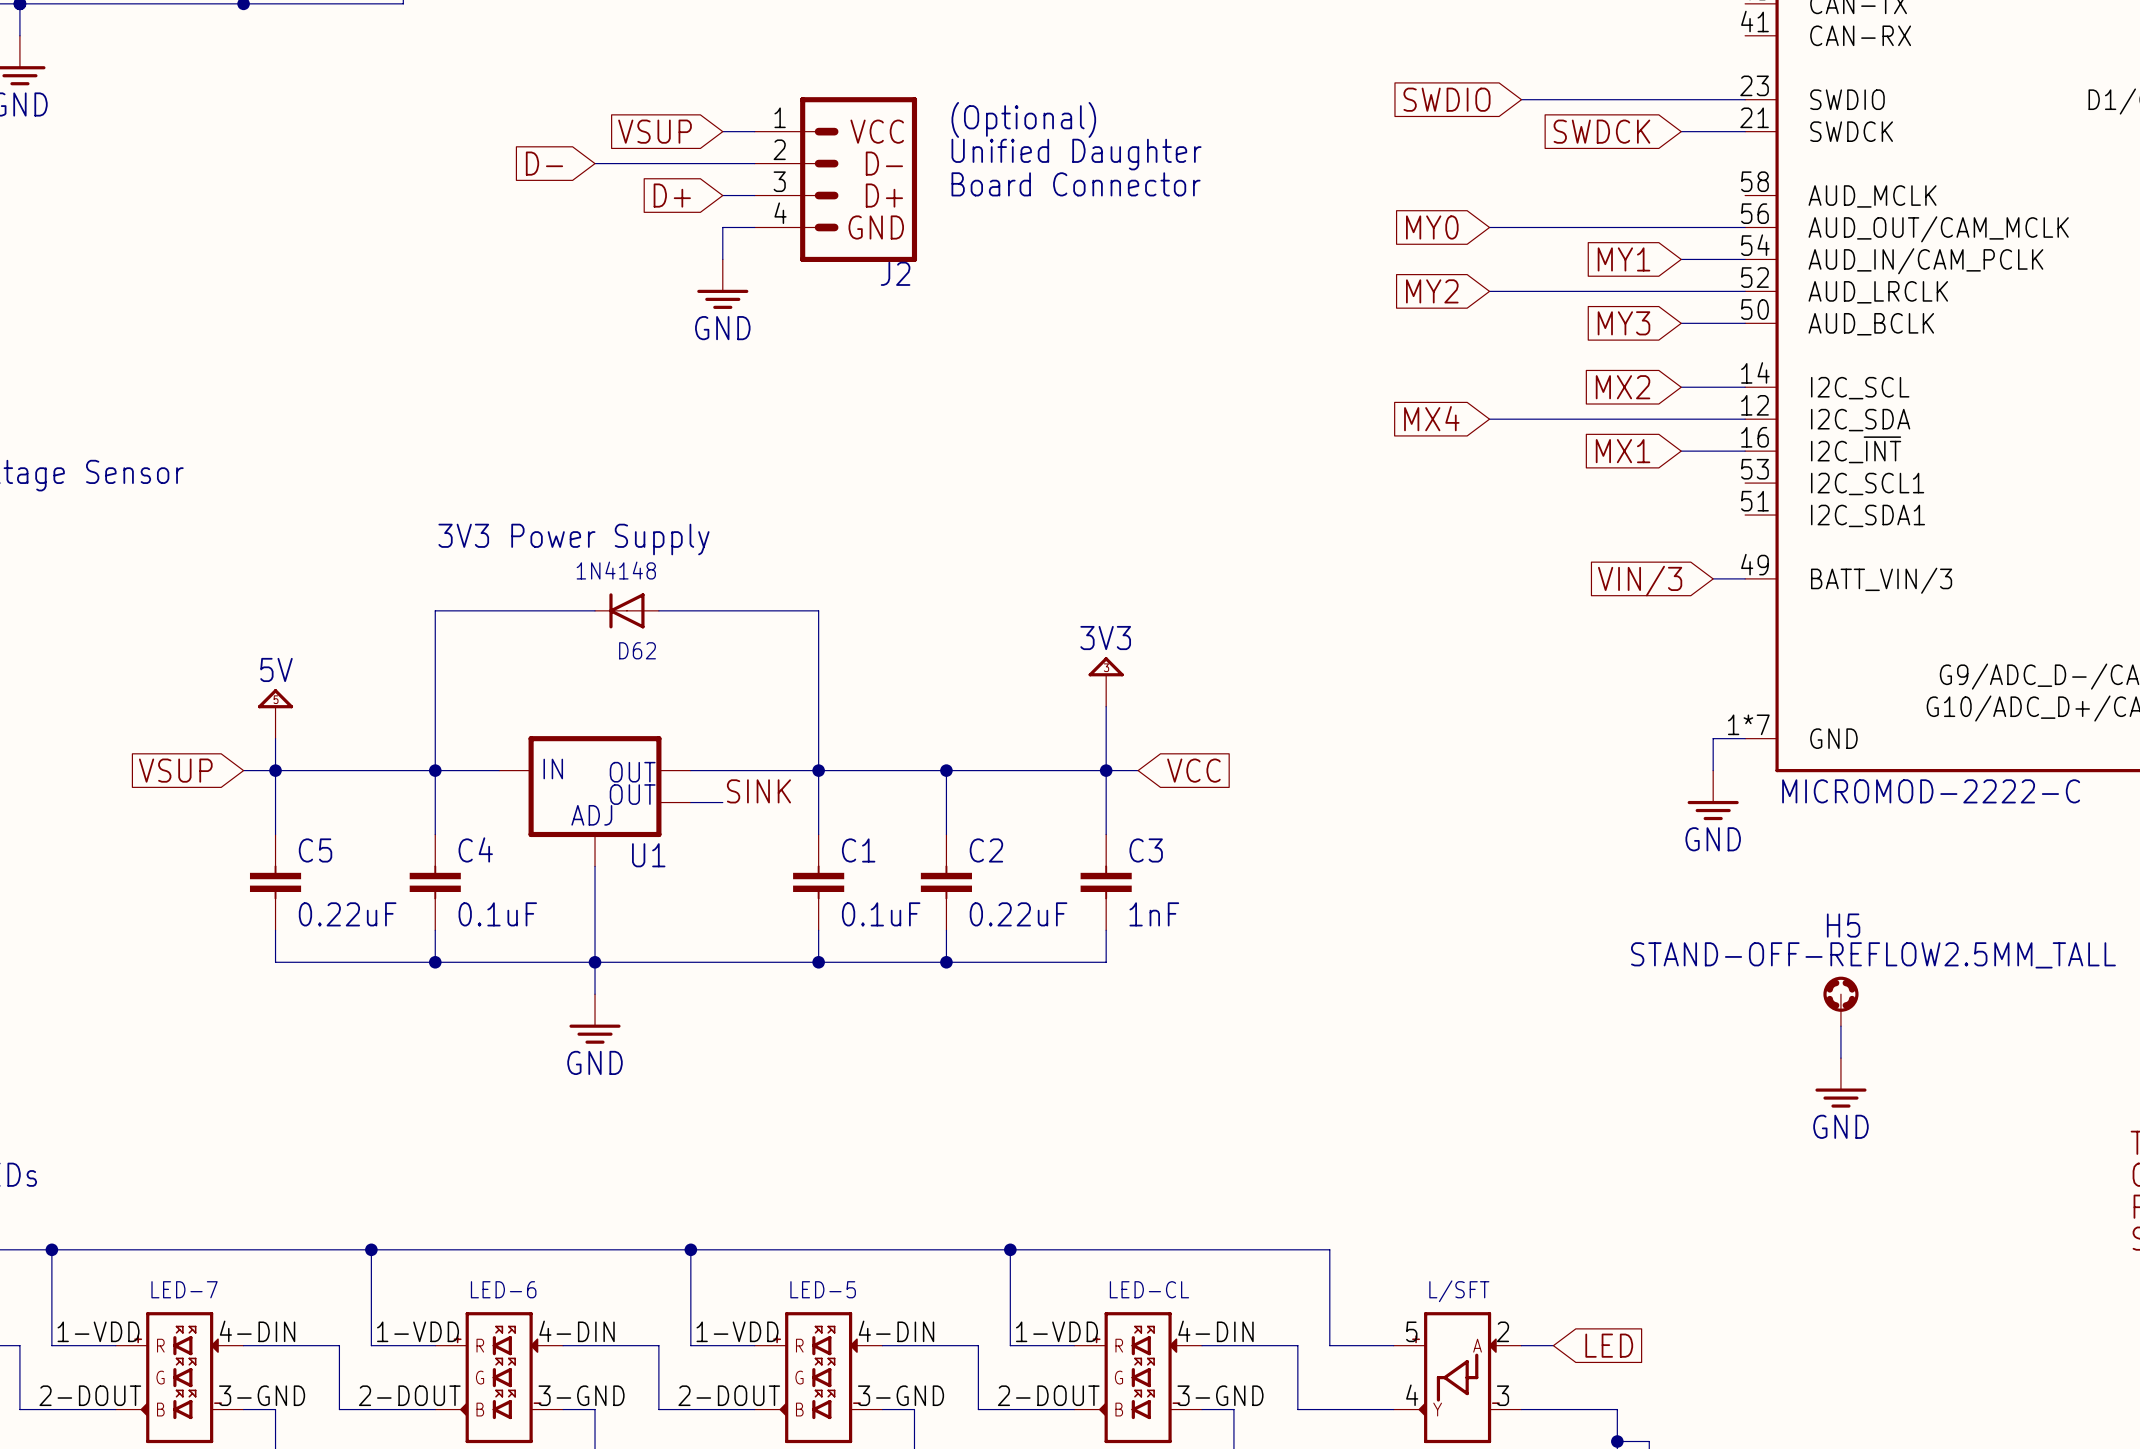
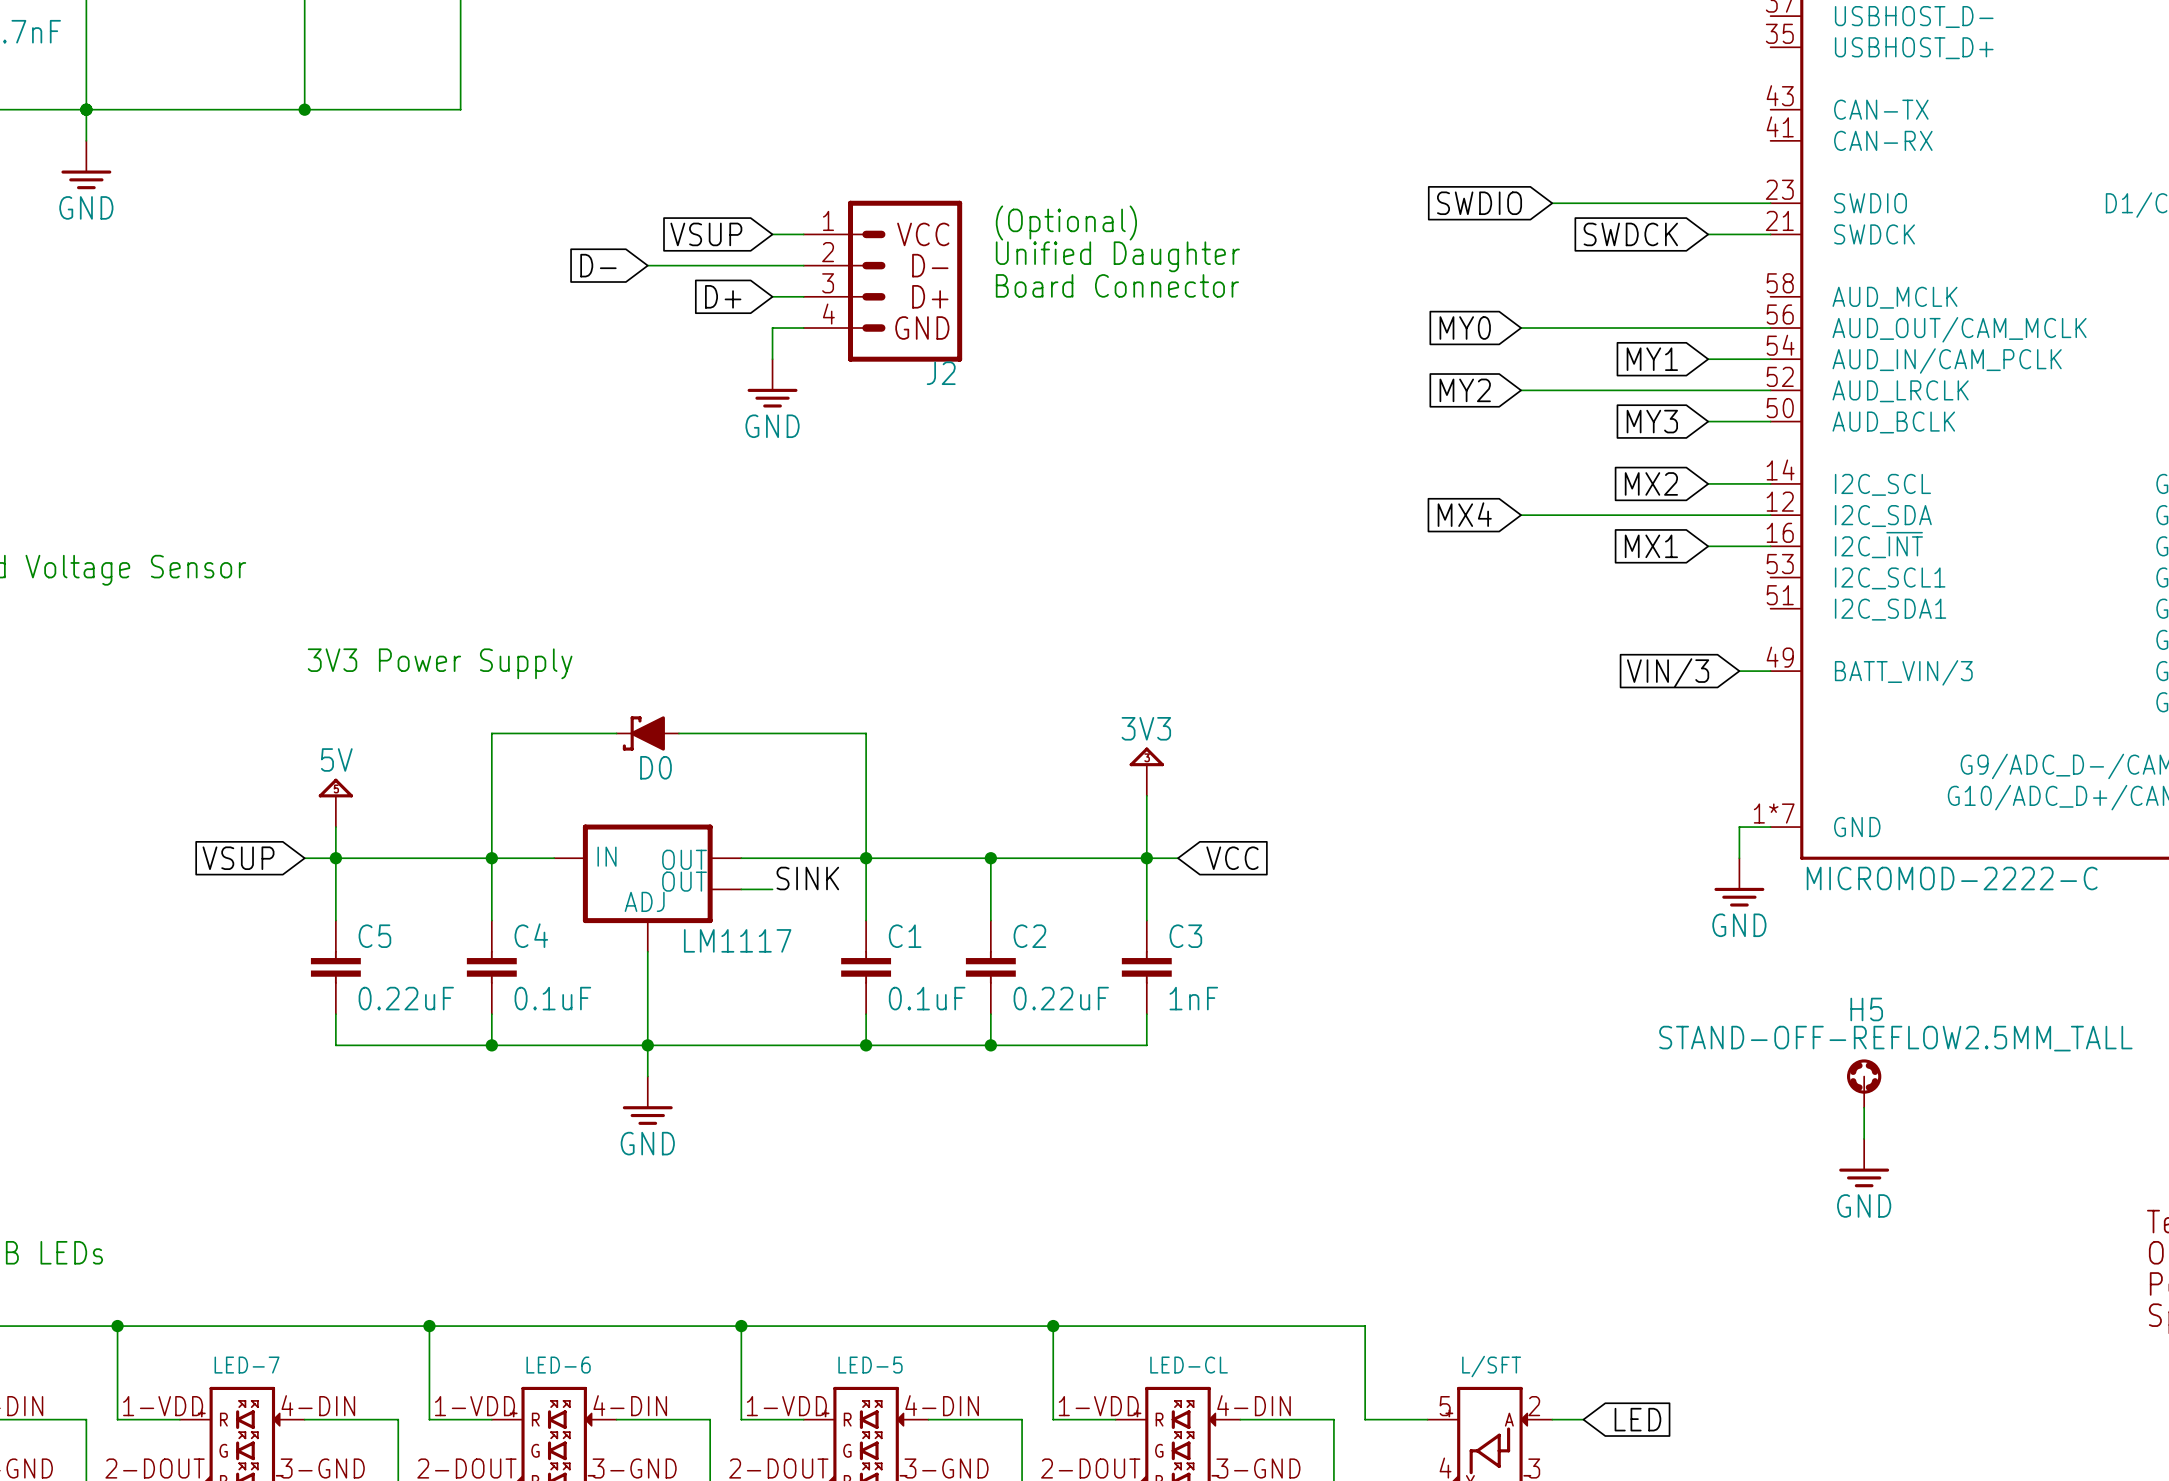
text position: 3V3 Power Supply (573, 539) -> 3V3 Power Supply (440, 663)
wire: (595, 610) (435, 610) (435, 642) -> (616, 733) (491, 733)
D62: 1N4148 (626, 610) -> none
wire: (658, 610) (818, 610) (818, 642) -> (678, 733) (866, 733)
D0: none -> (647, 733)
U1 name: U1 (648, 855) -> LM1117 (737, 940)

